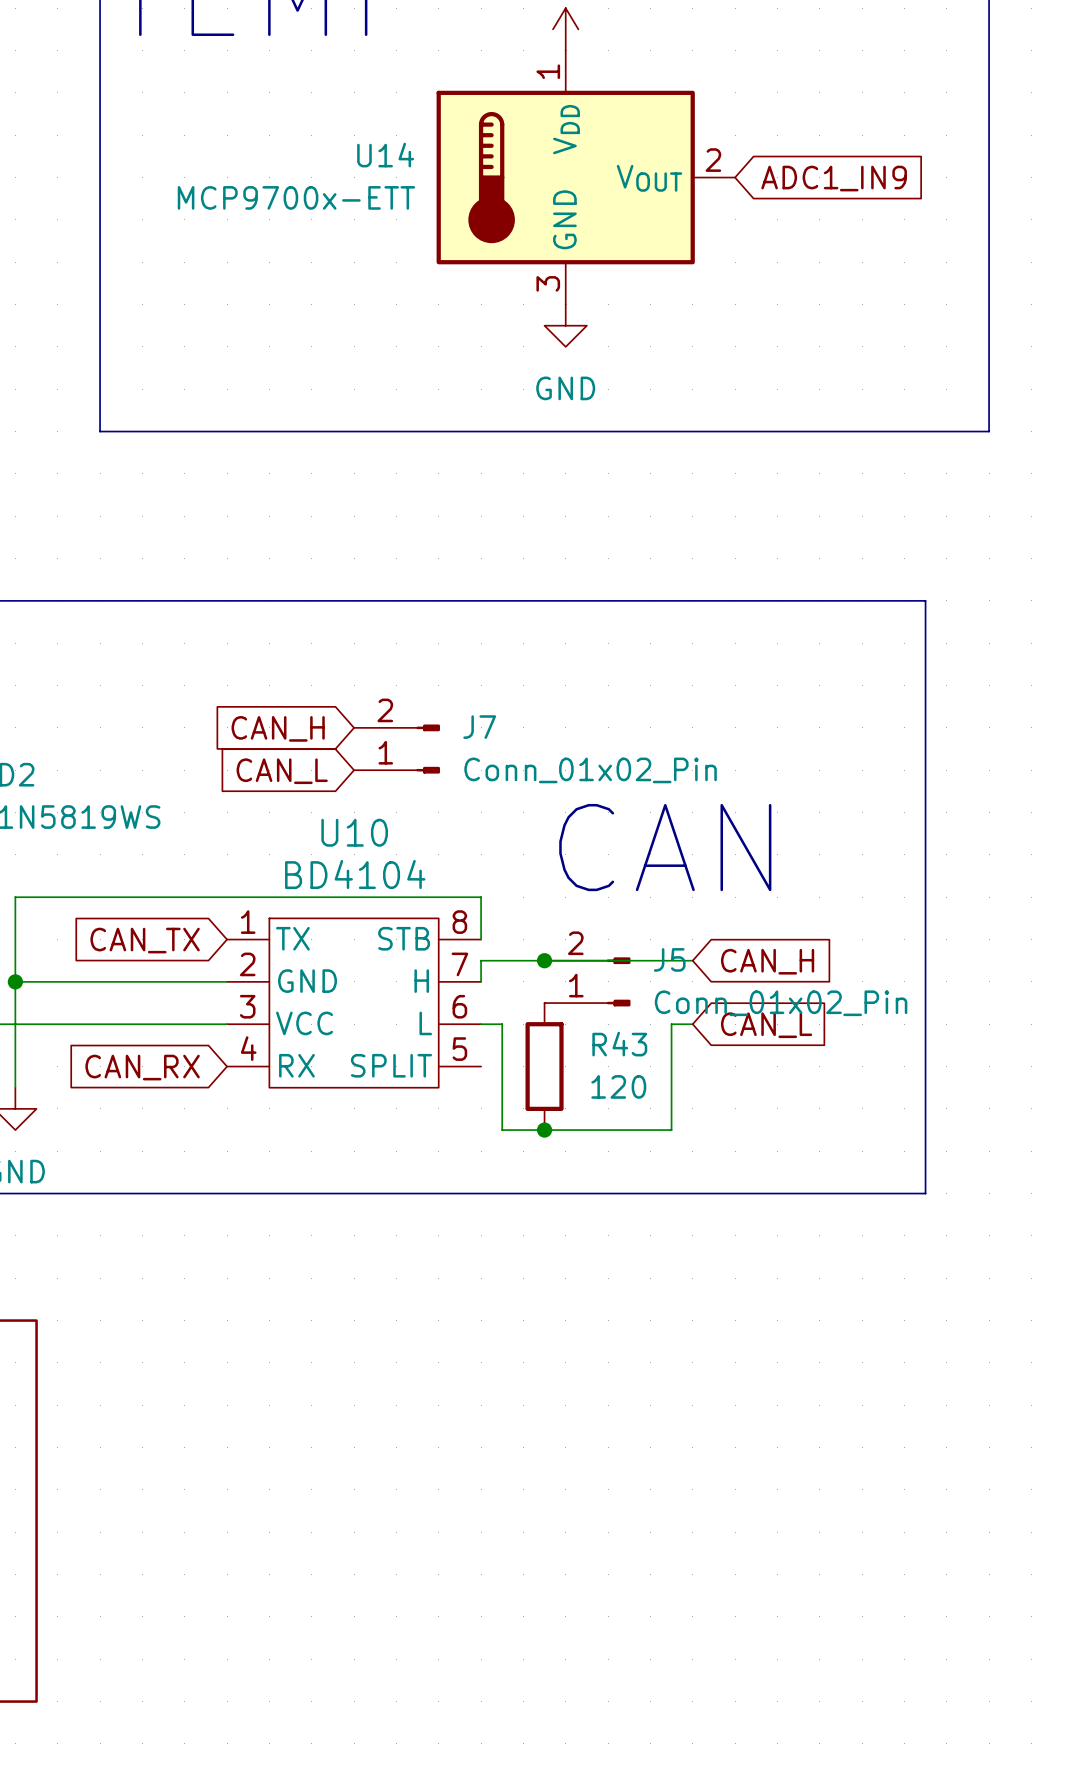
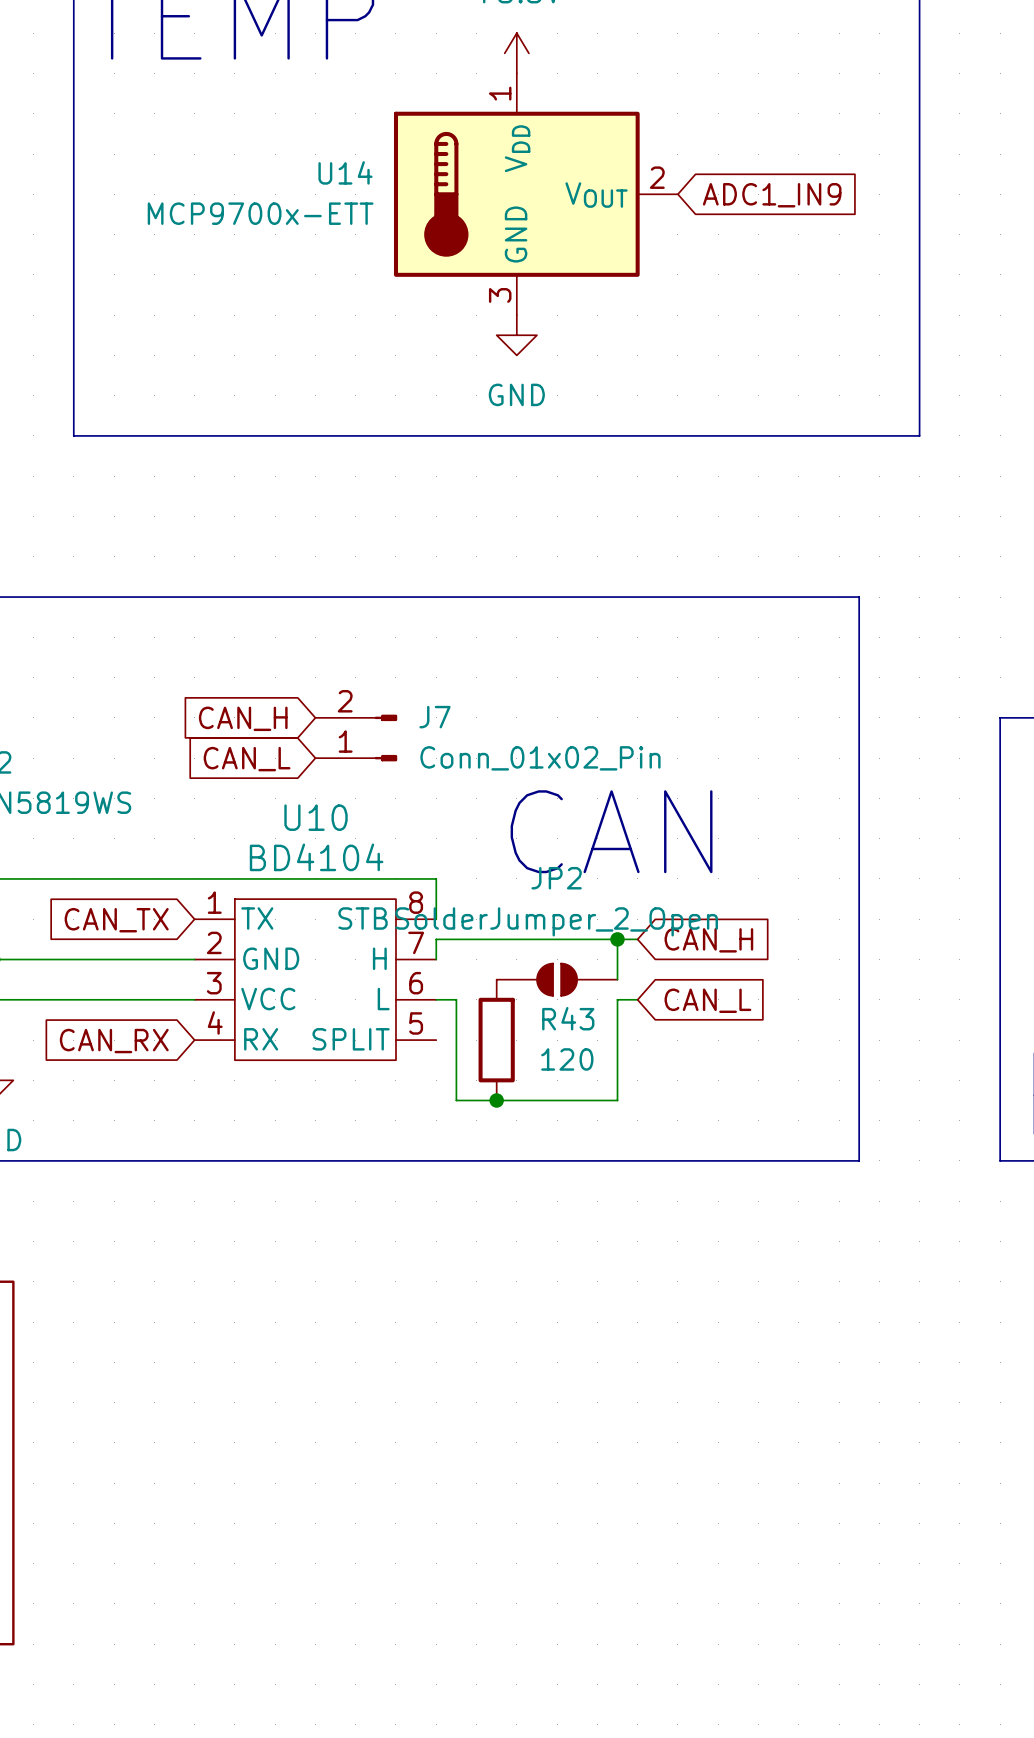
junction: (544, 960) -> none
wire: none -> (617, 939) (617, 979)
junction: none -> (617, 939)
J5: Conn_01x02_Pin (587, 981) -> none
JP2: none -> SolderJumper_2_Open (557, 979)

